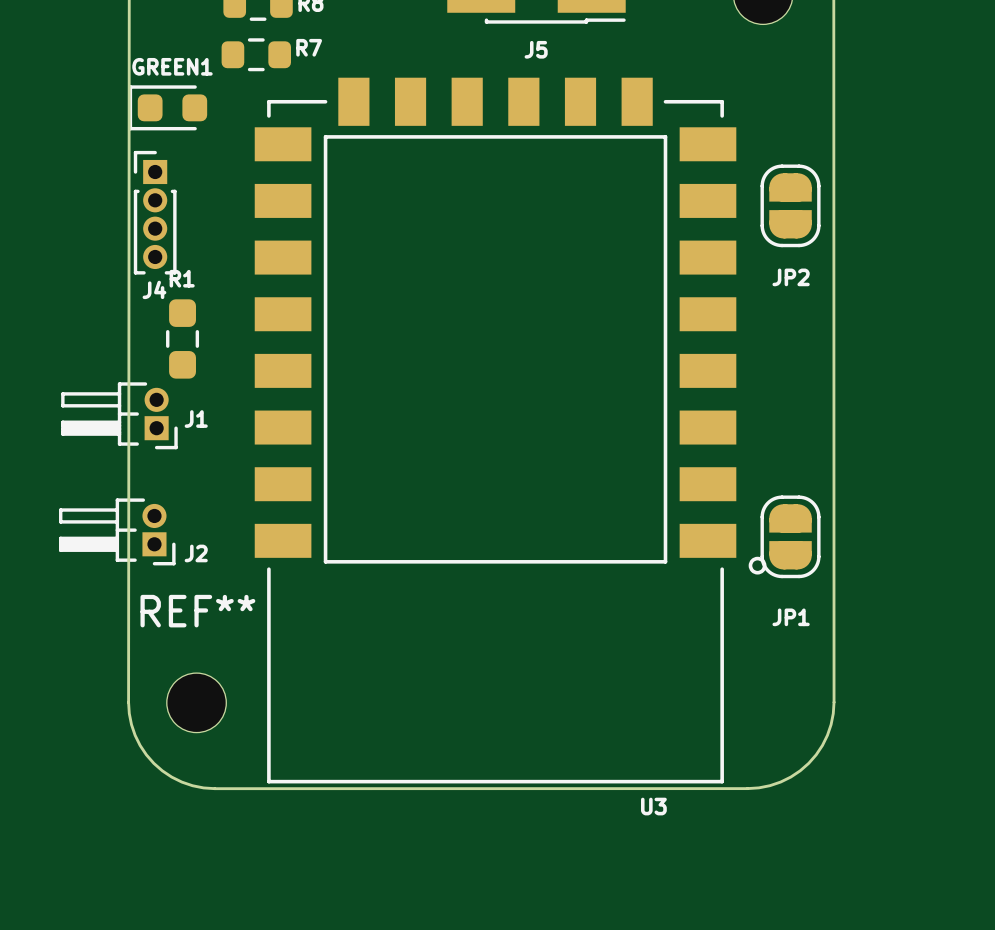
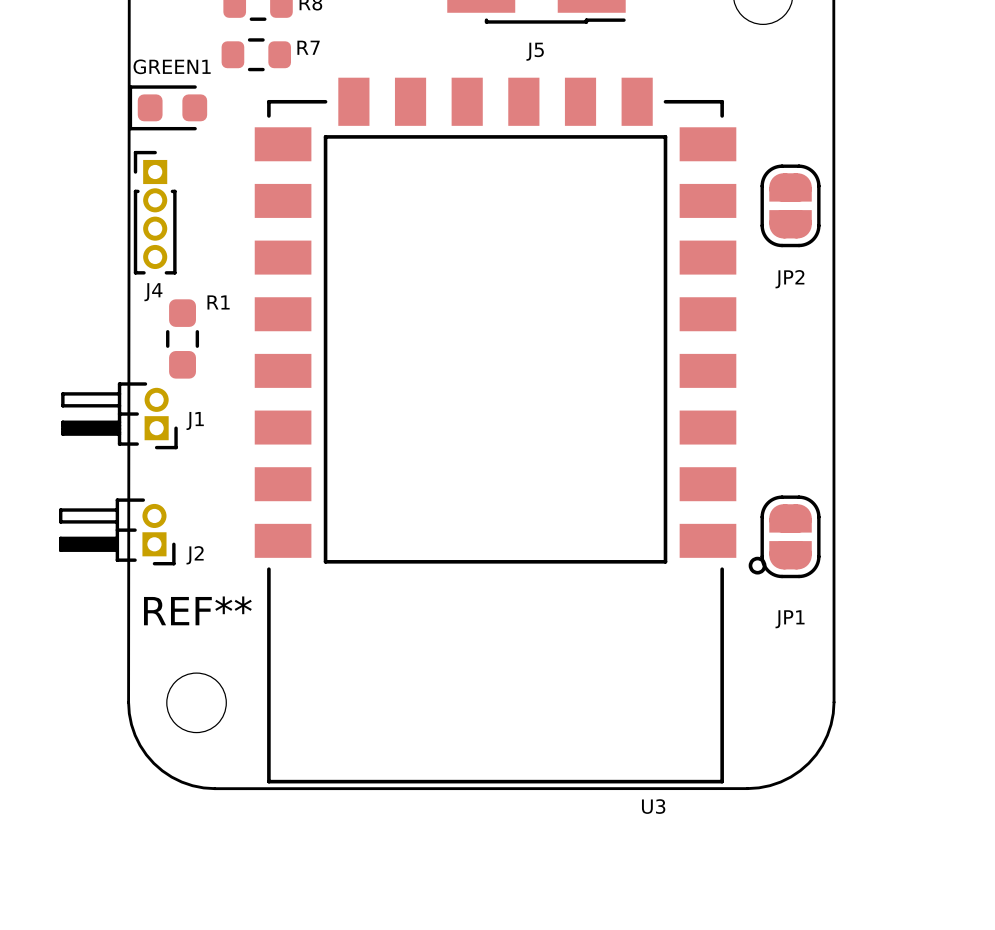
R1 name position: R1 (182, 278) -> R1 (218, 302)

